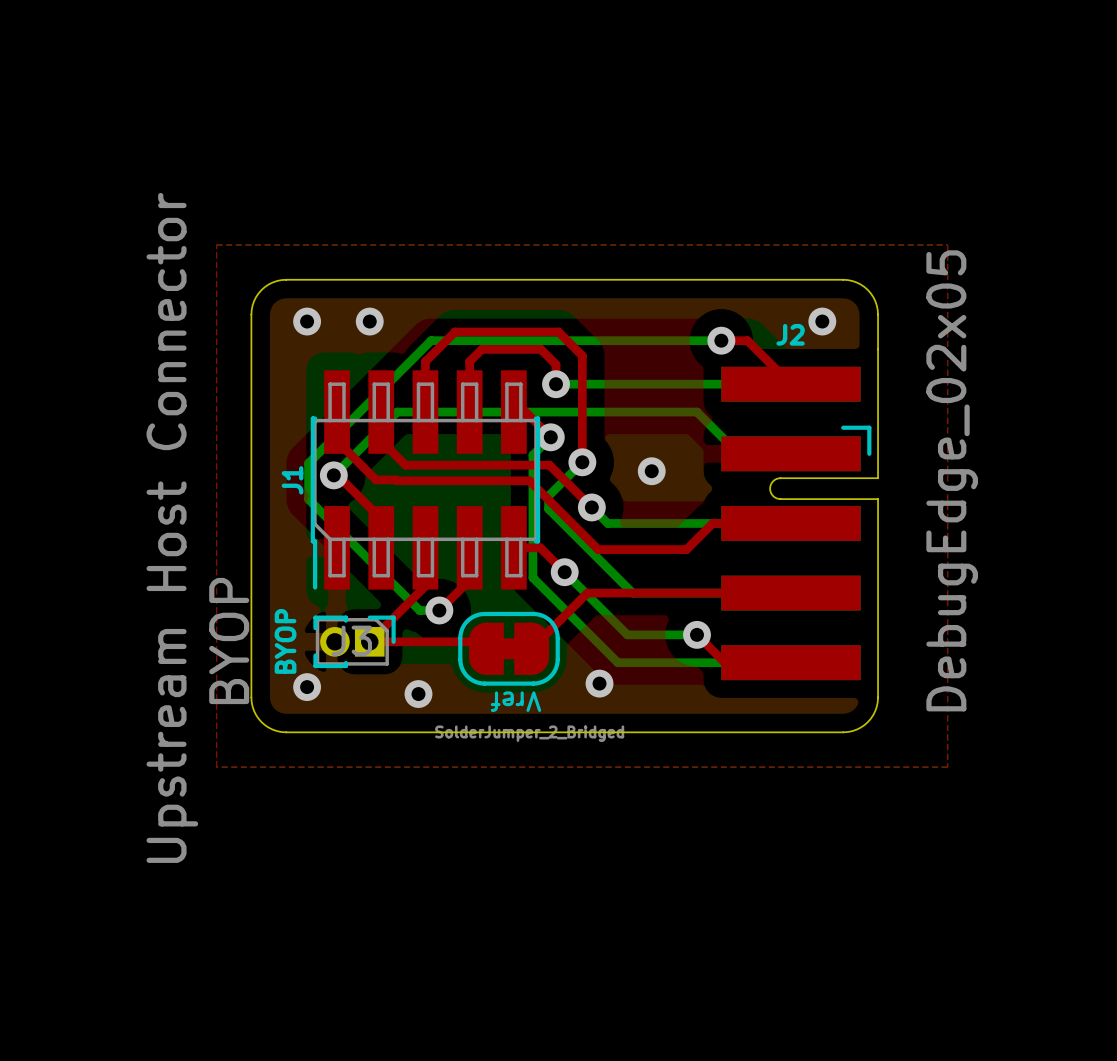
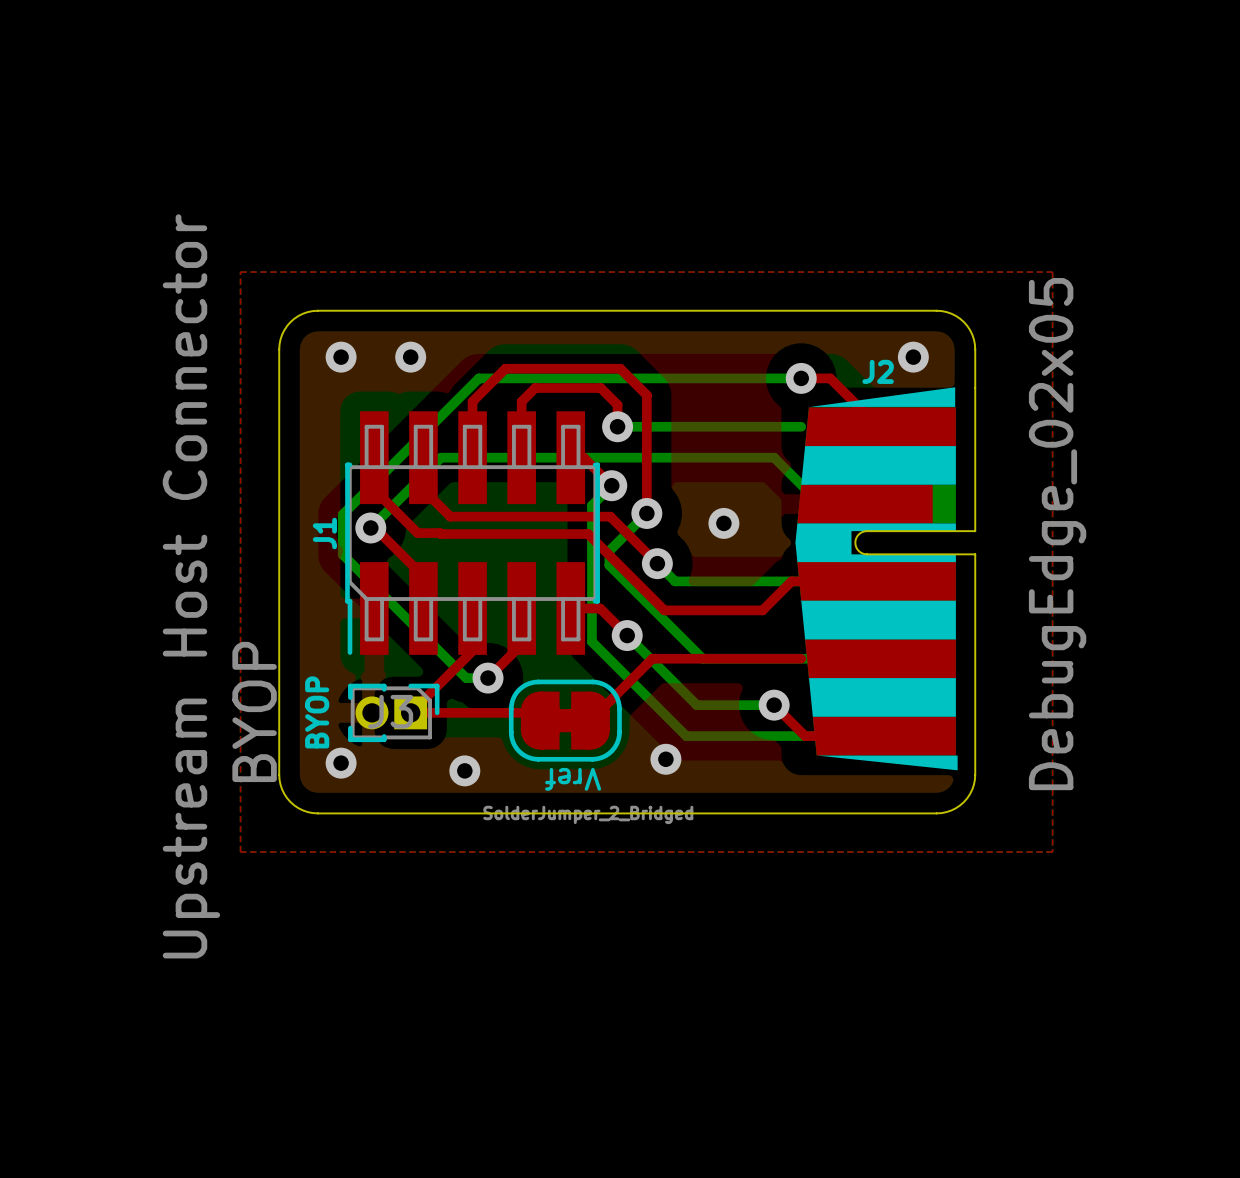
J2 footprint: [721, 348, 879, 699] -> [795, 387, 977, 776]
drawing: none -> [810, 387, 956, 407]
drawing: none -> [817, 755, 958, 771]

